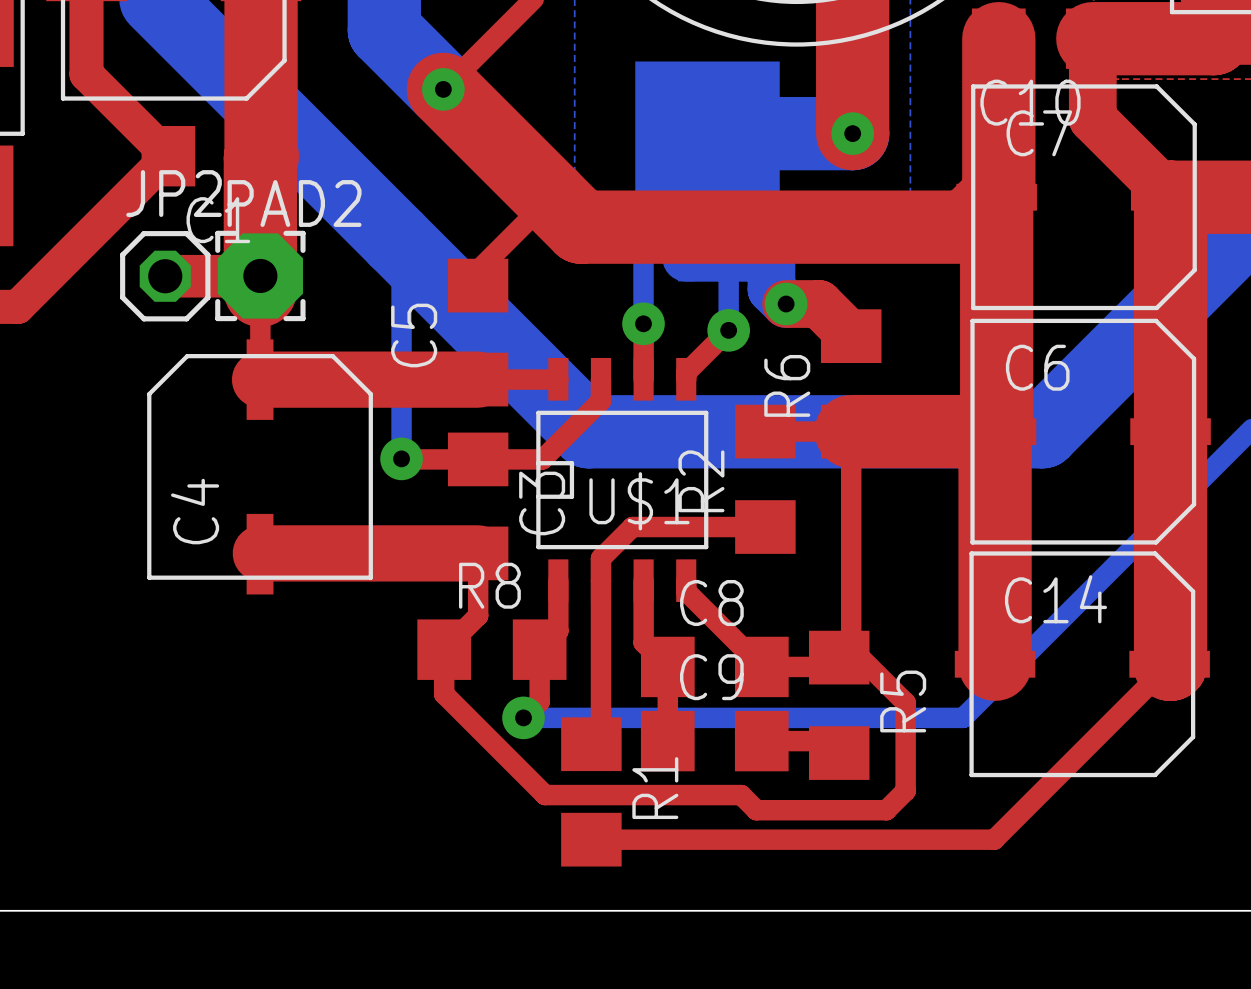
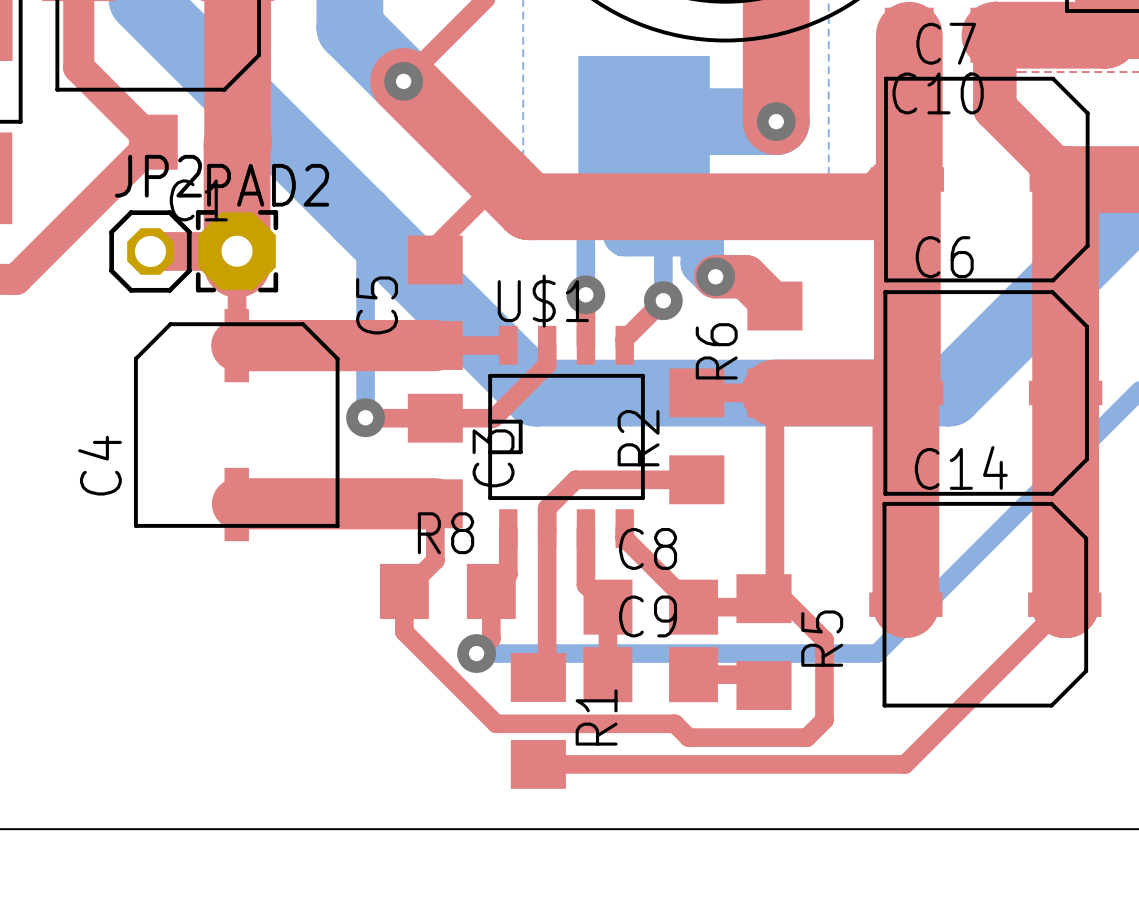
C7 name position: C7 (1039, 133) -> C7 (946, 43)
C6 name position: C6 (1037, 367) -> C6 (944, 257)
U$1 name position: U$1 (639, 501) -> U$1 (543, 301)
C4 name position: C4 (195, 511) -> C4 (99, 465)
C14 name position: C14 (1055, 599) -> C14 (961, 467)

